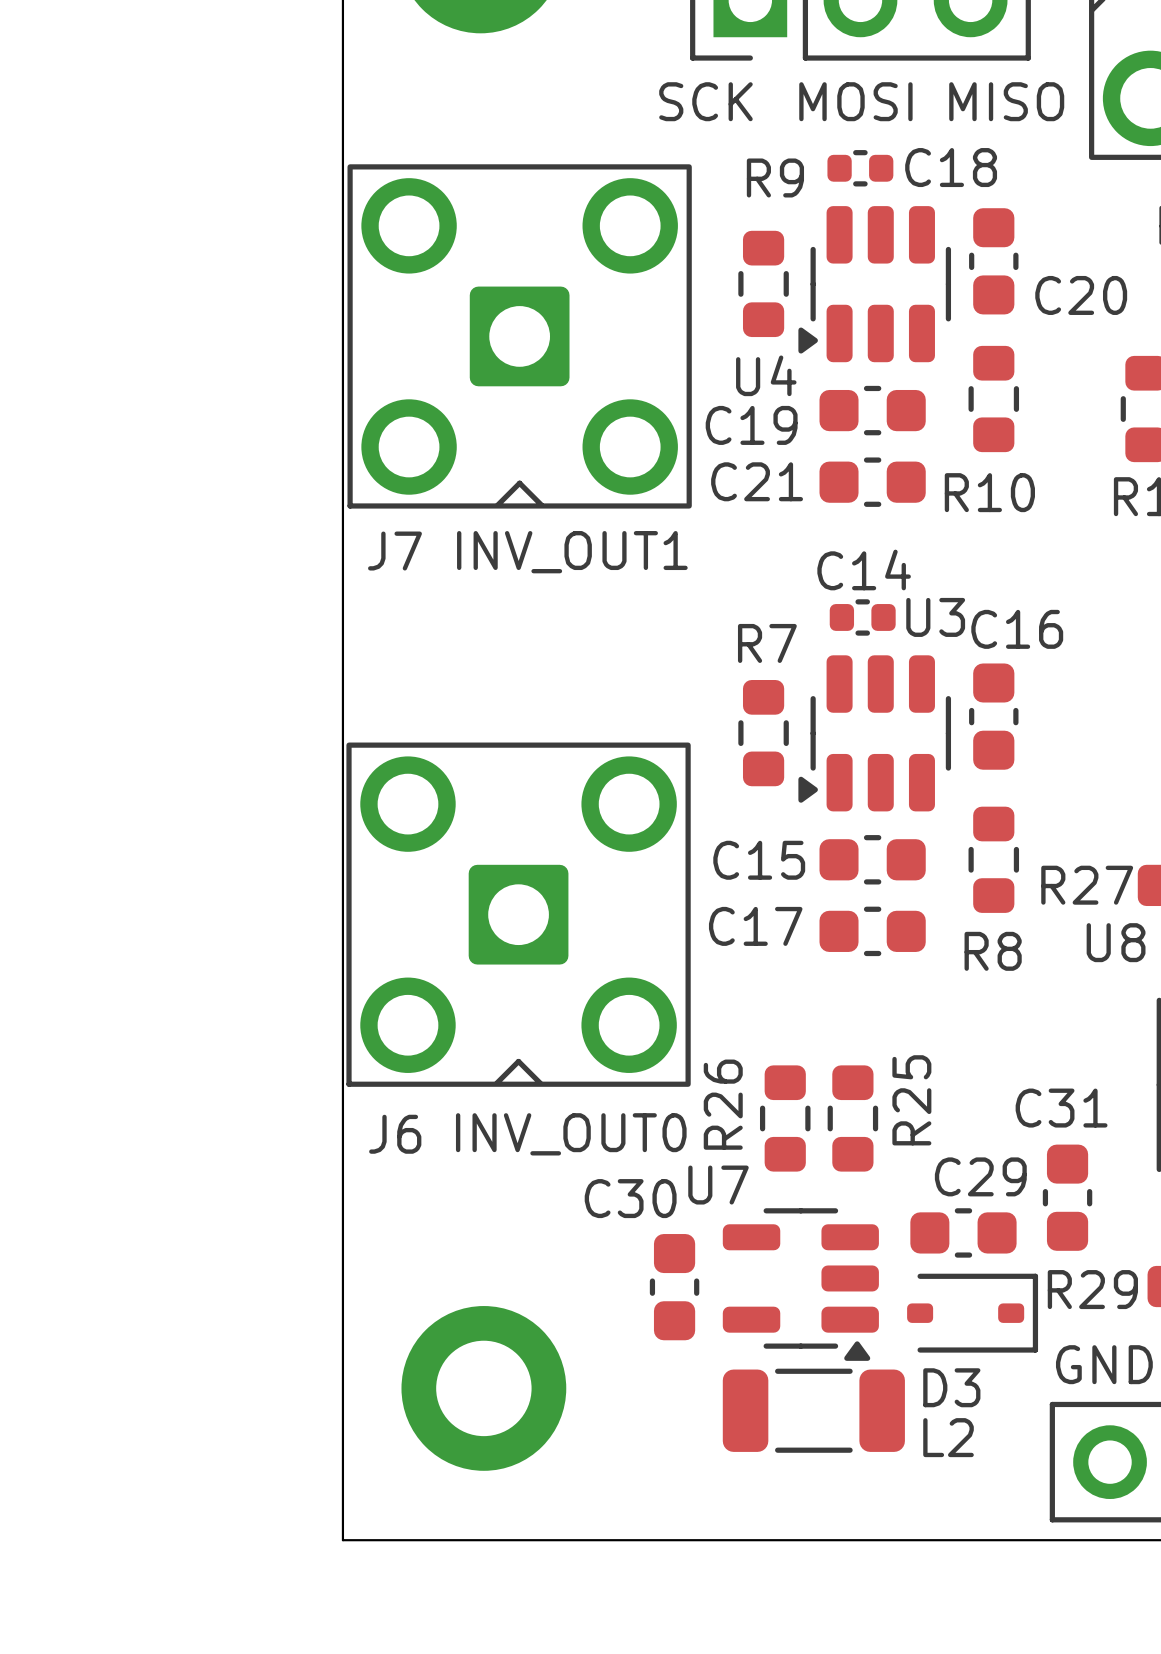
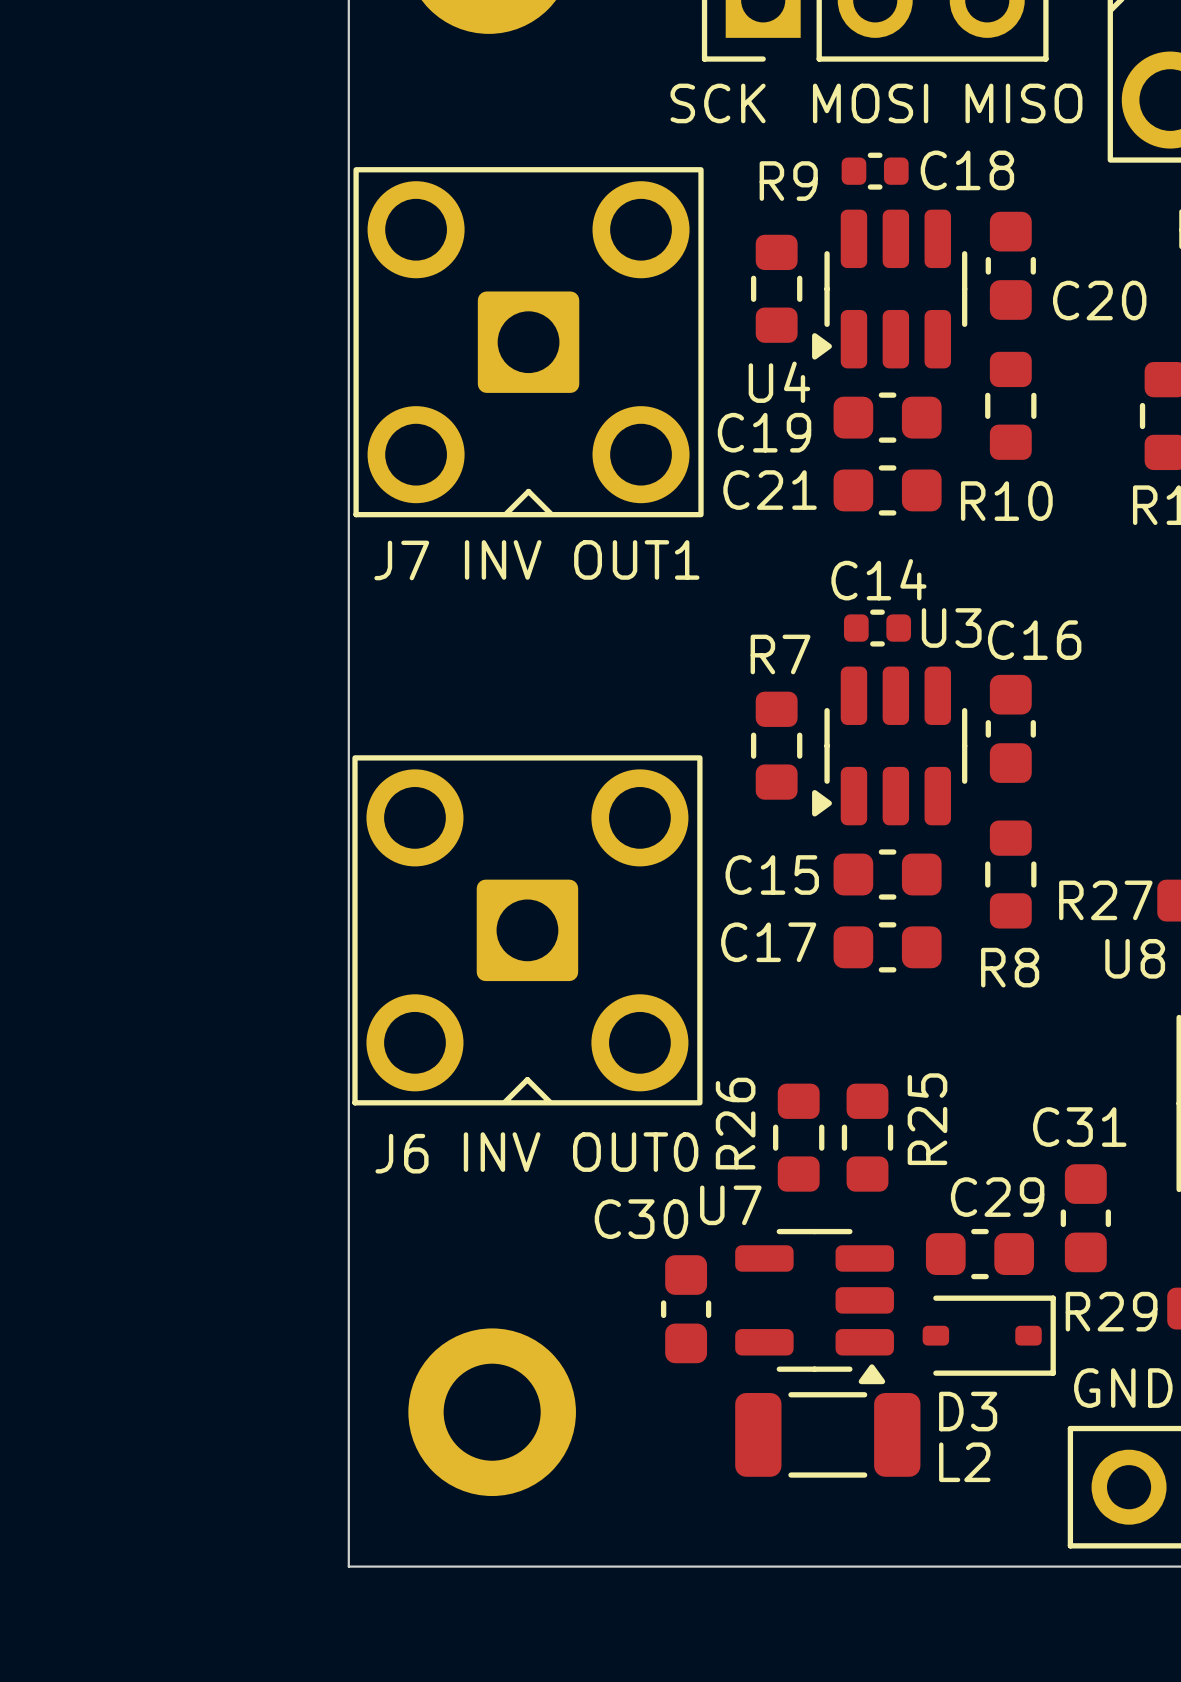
text: INV_OUT1 (572, 552) -> INV OUT1 (582, 559)
text: INV_OUT0 (571, 1134) -> INV OUT0 (581, 1152)

